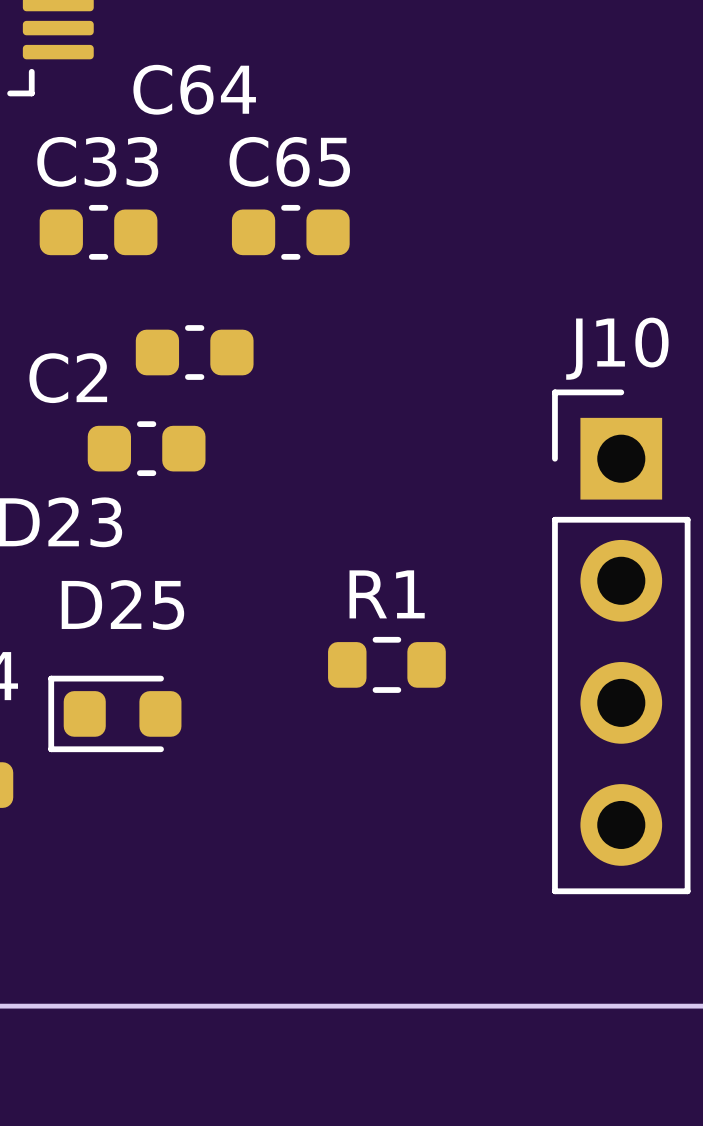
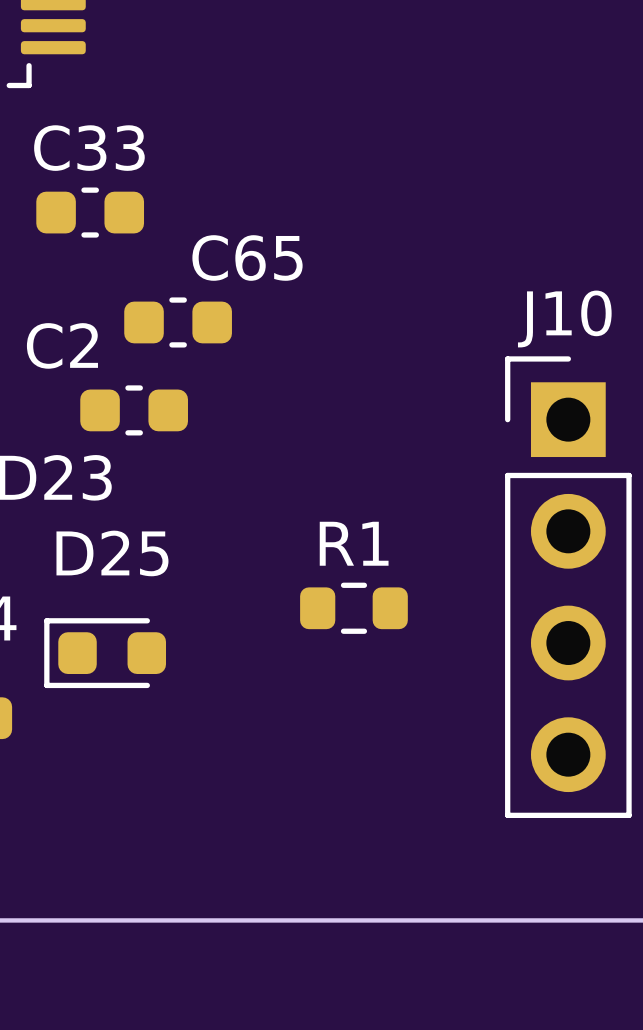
C64 name: C64 (194, 89) -> C65 (247, 257)
C65: (290, 232) -> none

